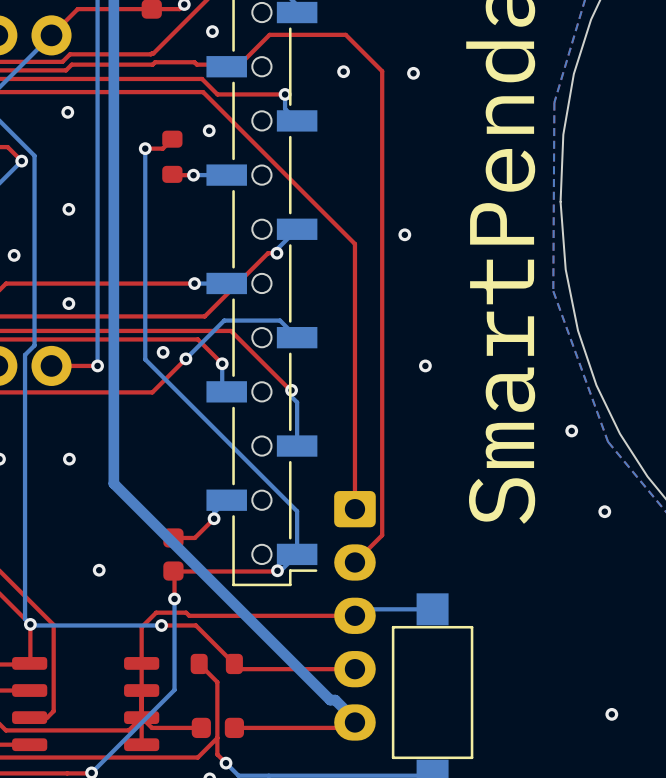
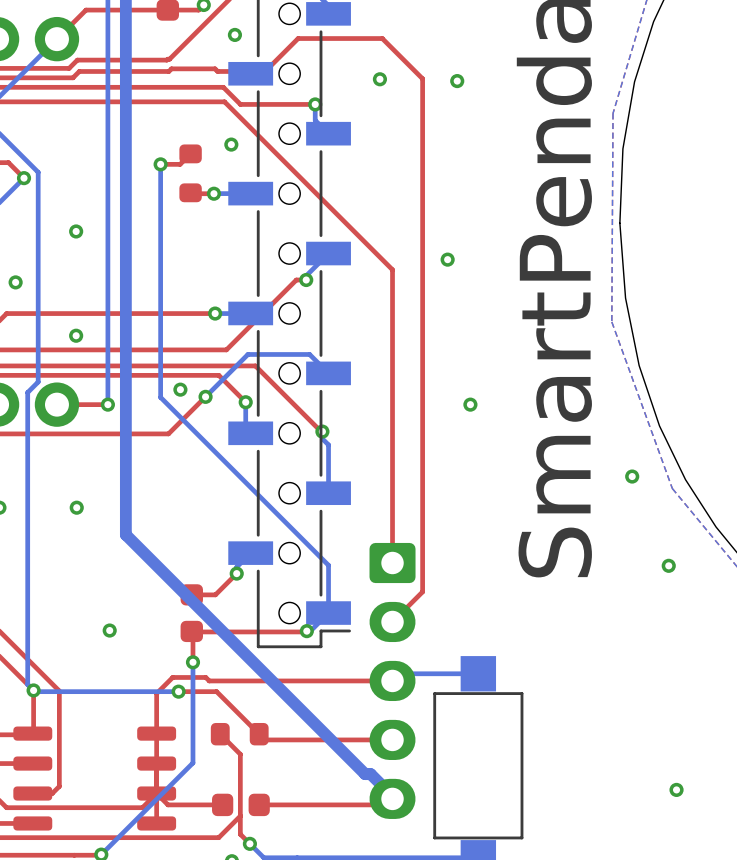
via: (67, 112) -> none

